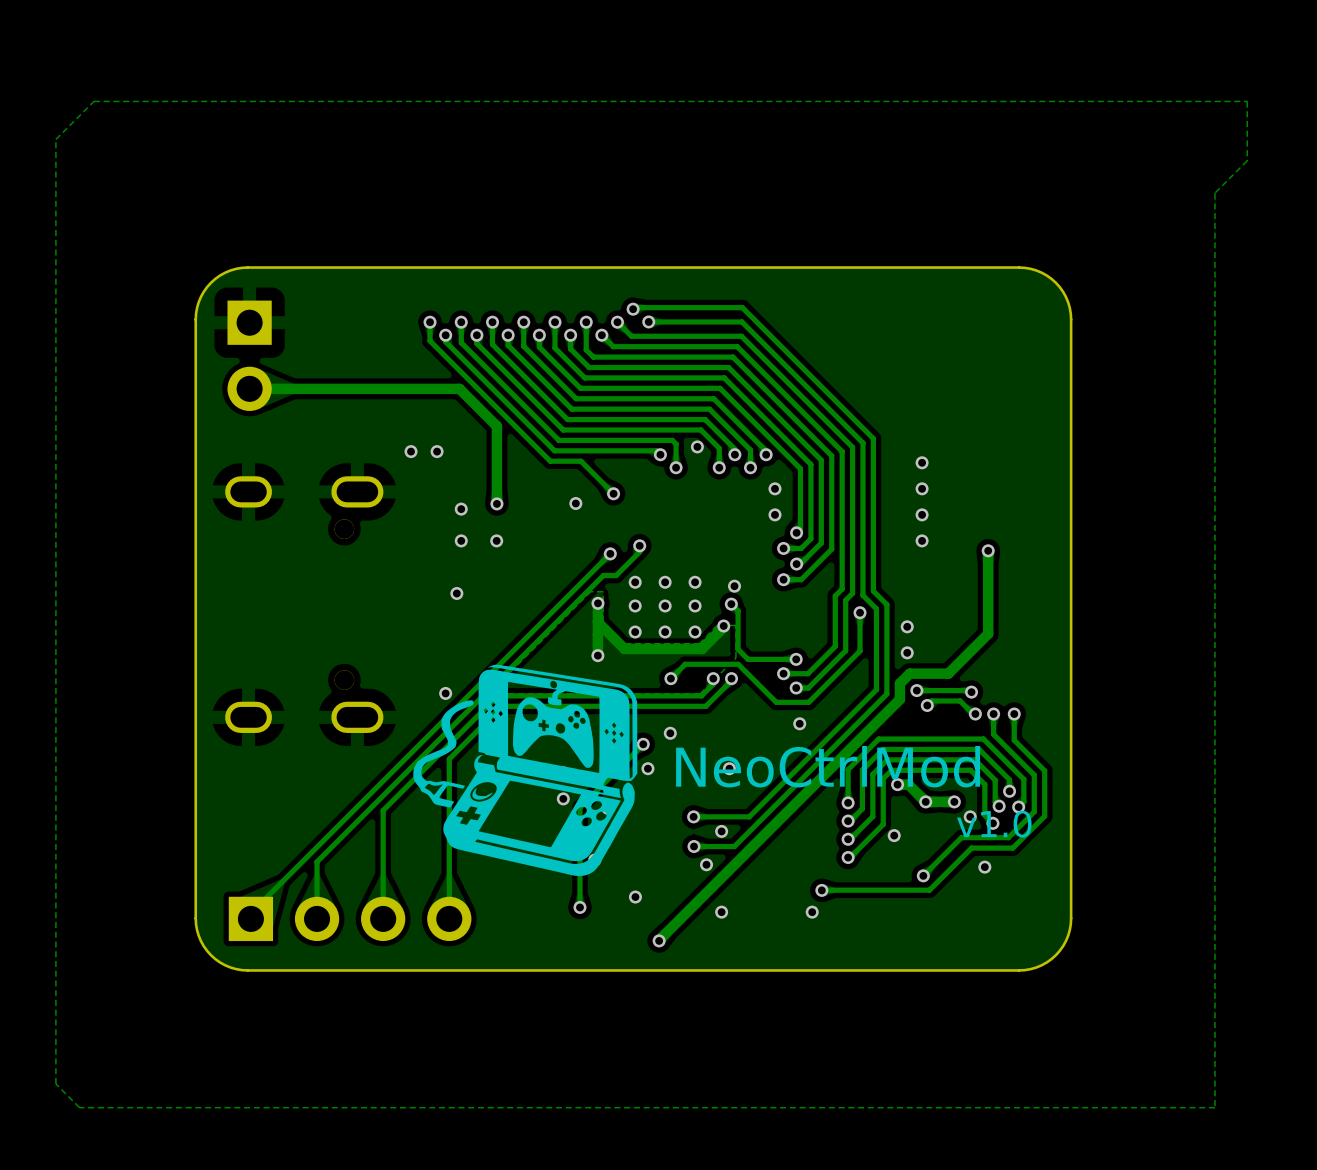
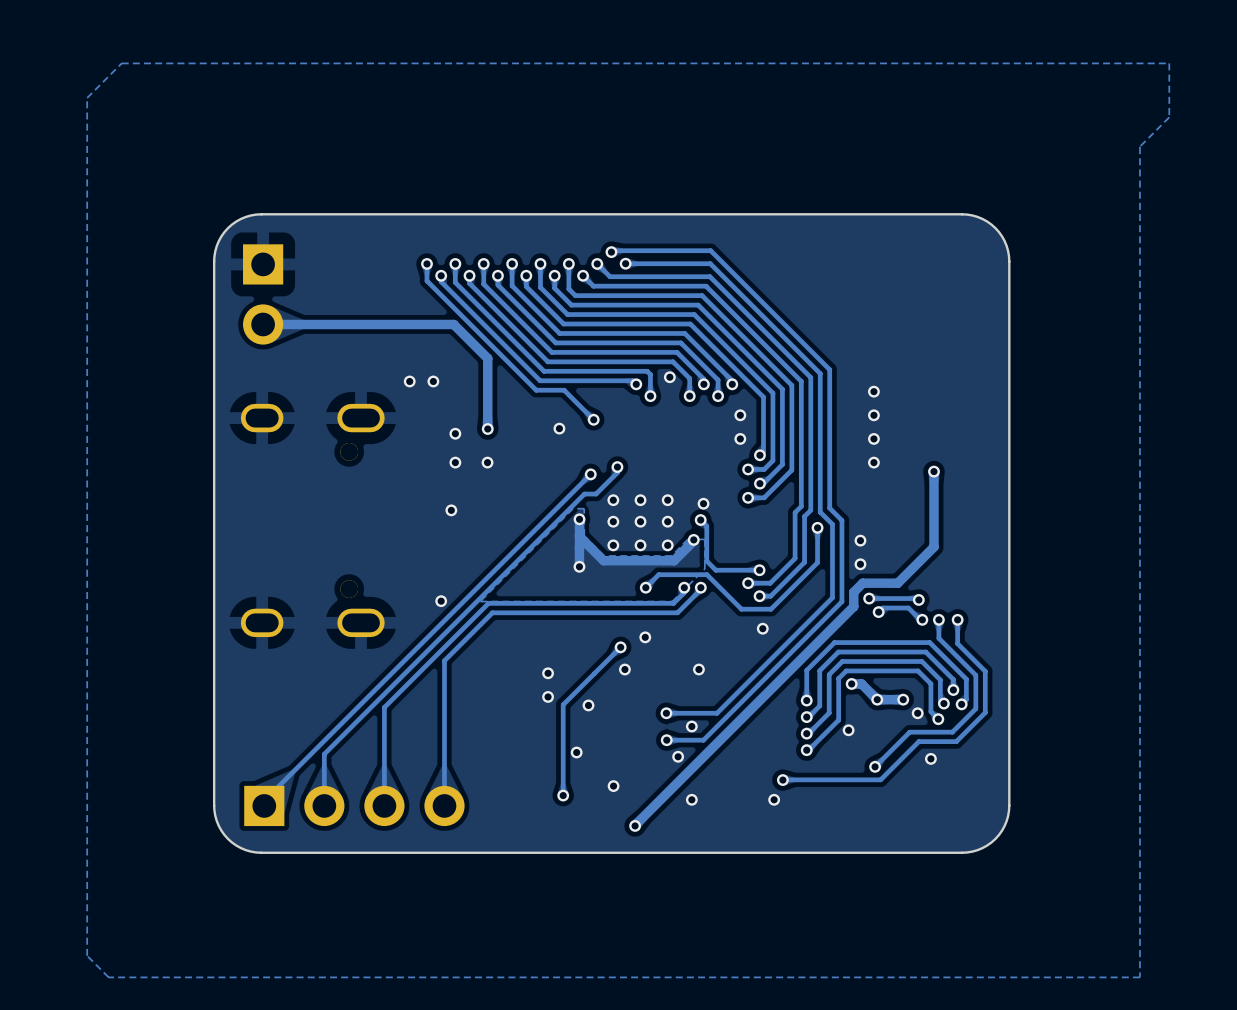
drawing: [413, 664, 638, 877] -> none
text: NeoCtrlMod (828, 766) -> none
text: v1.0 (994, 824) -> none

